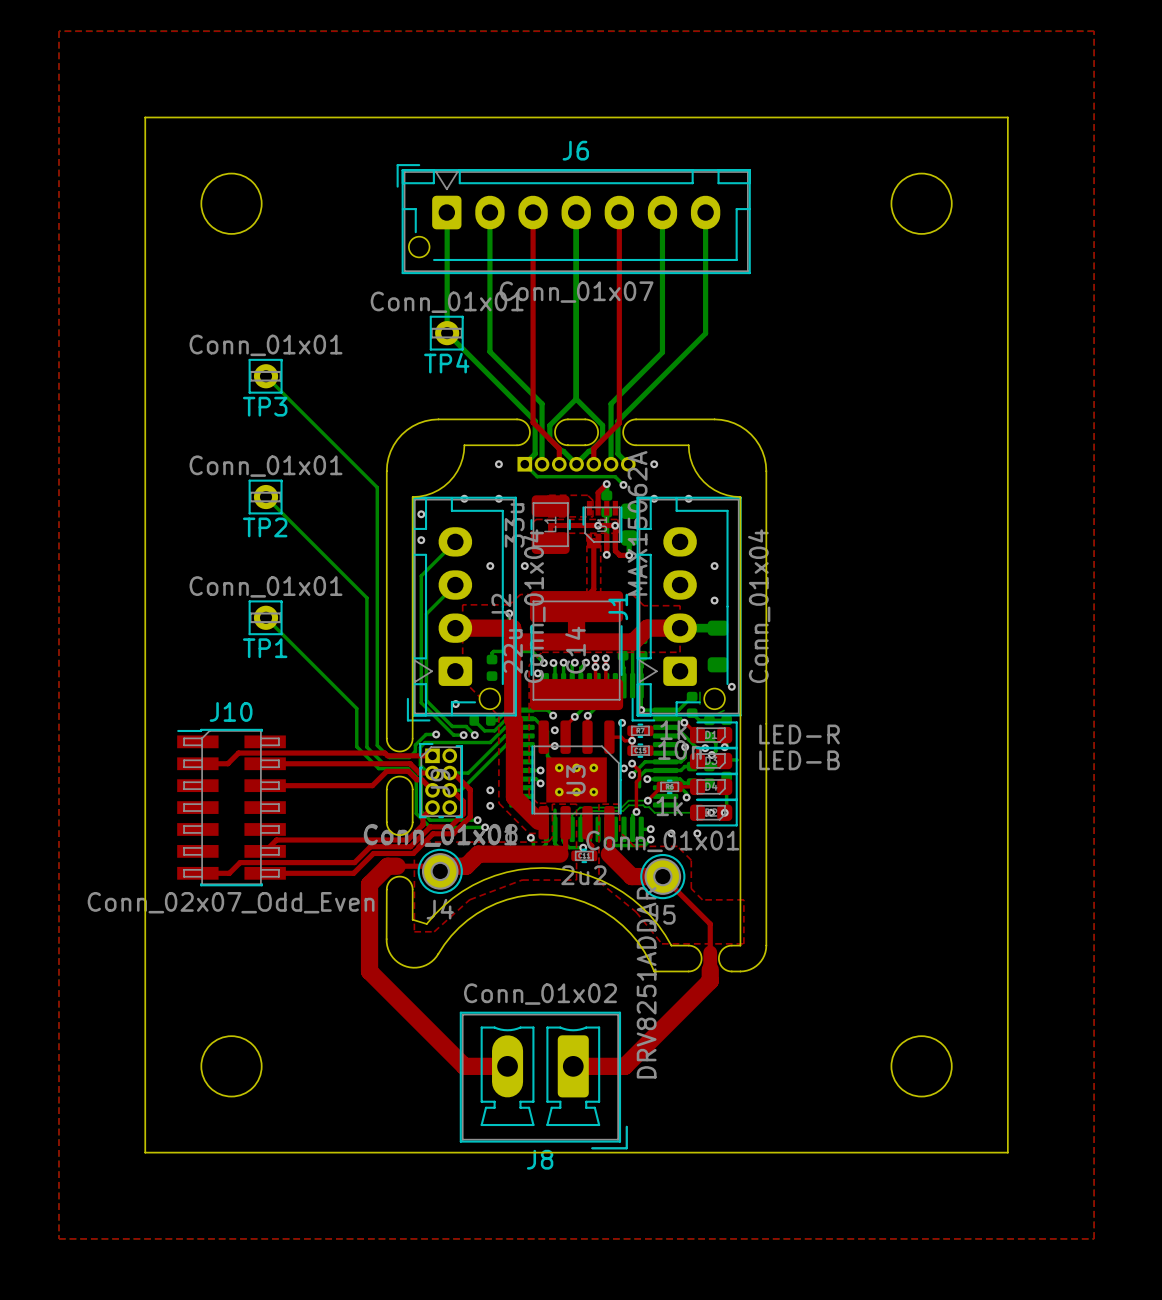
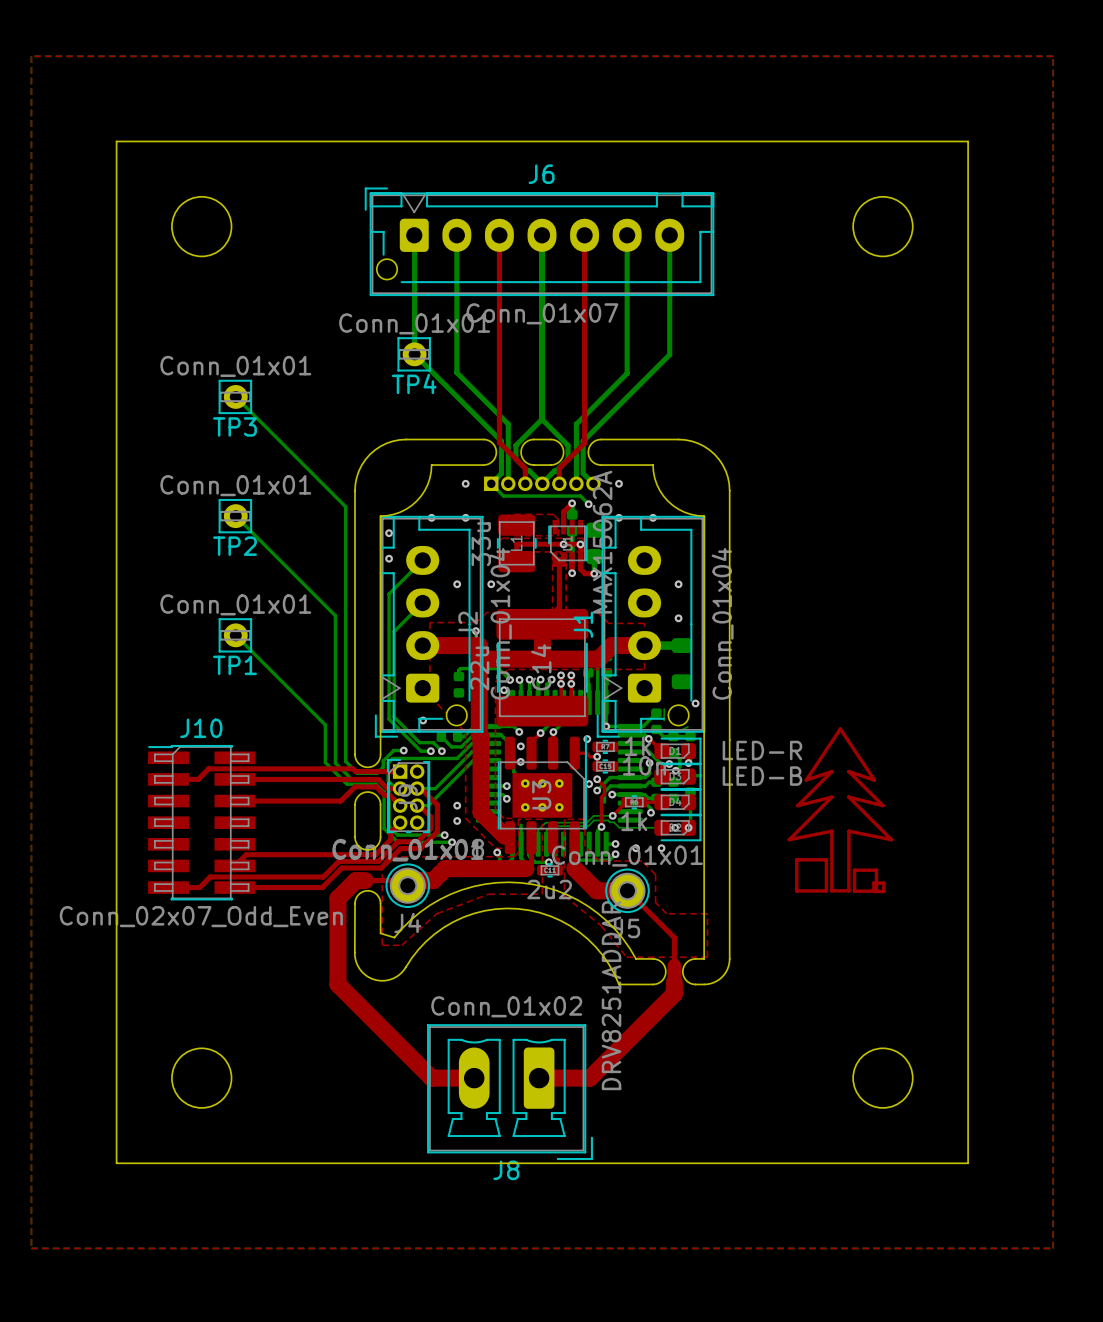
top track: none -> (840, 729) (806, 780) (831, 771) (797, 805) (831, 797) (789, 839) (831, 831) (831, 890) (848, 890) (848, 831) (891, 839) (848, 797) (882, 805) (848, 771) (874, 780) (840, 729)
top track: none -> (796, 859) (826, 859) (826, 890) (796, 890) (796, 859)
top track: none -> (854, 870) (876, 870) (876, 891) (854, 891) (854, 870)
top track: none -> (873, 883) (883, 883) (883, 891) (873, 891) (873, 883)

